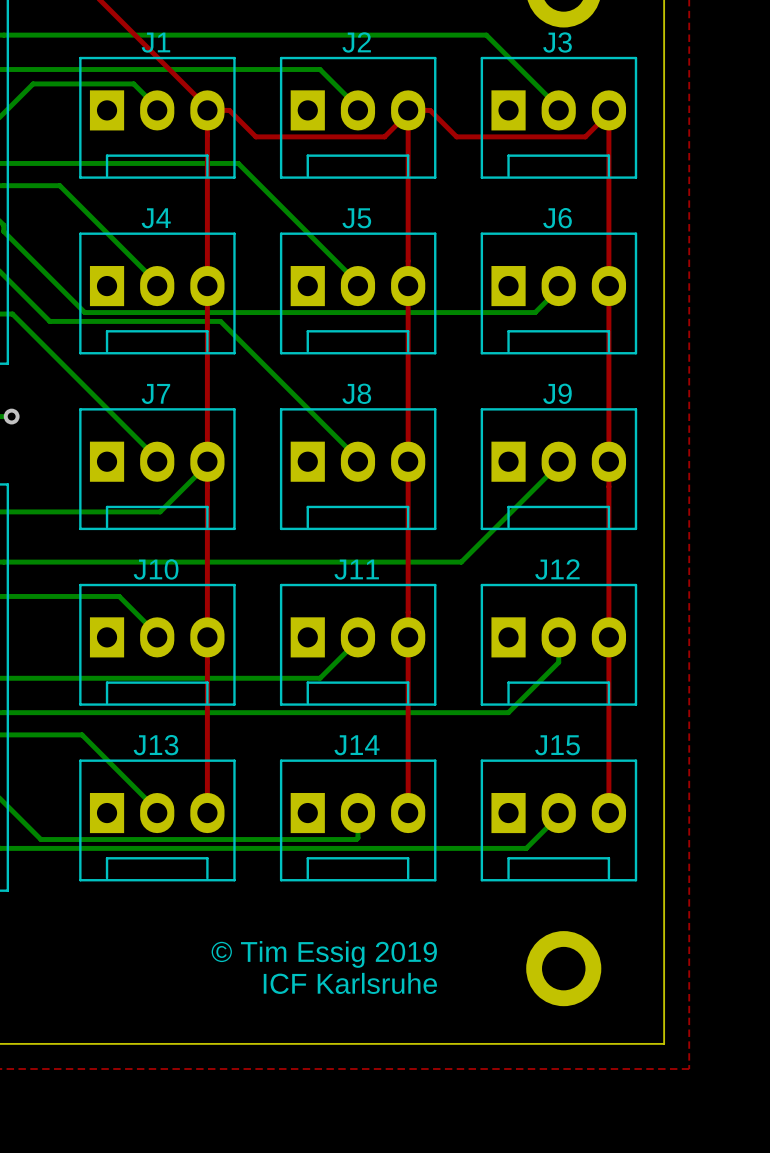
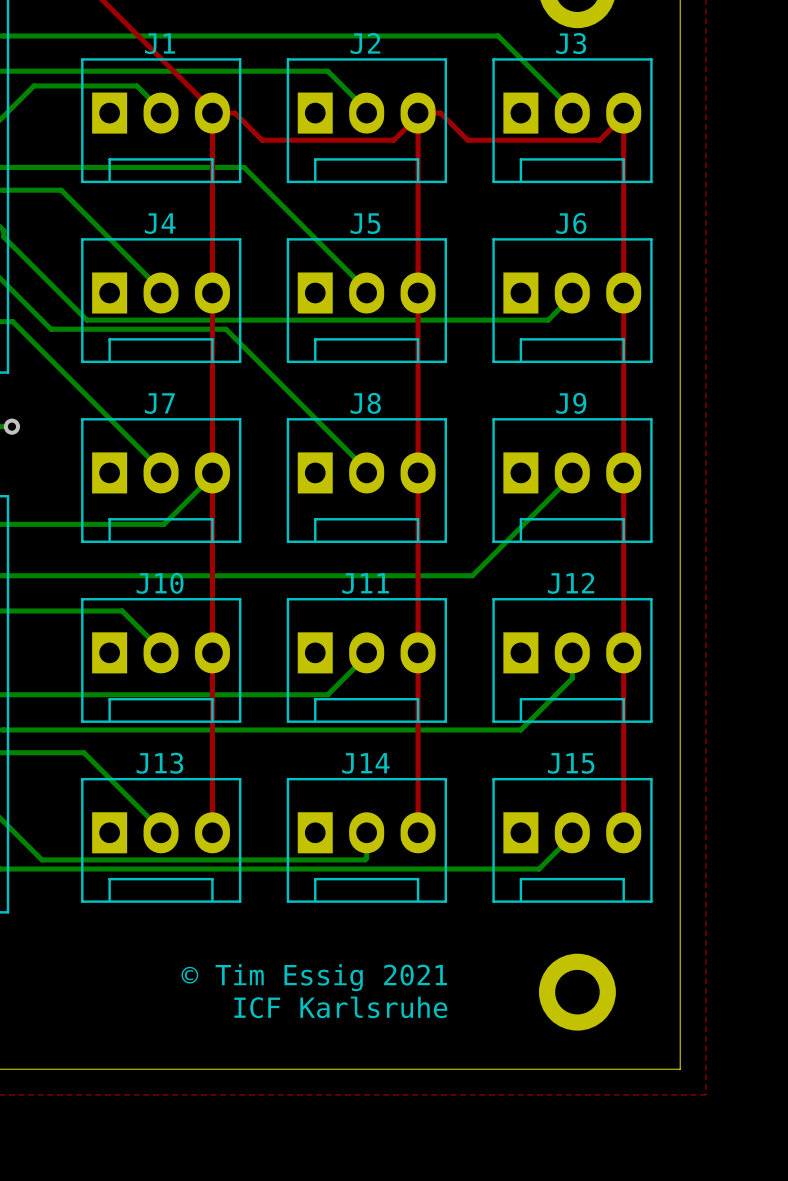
text: © Tim Essig 2019 (324, 954) -> © Tim Essig 2021 (314, 977)

